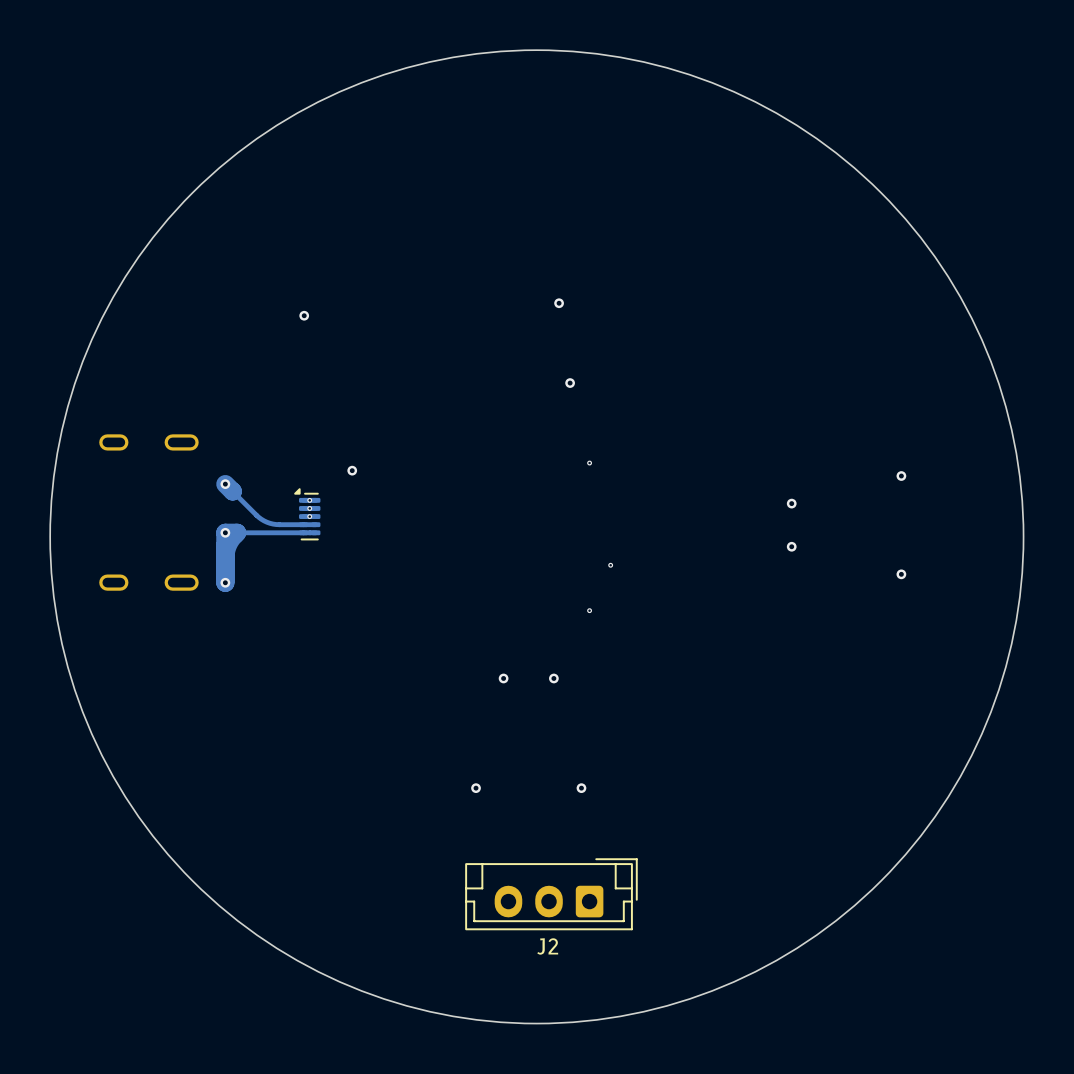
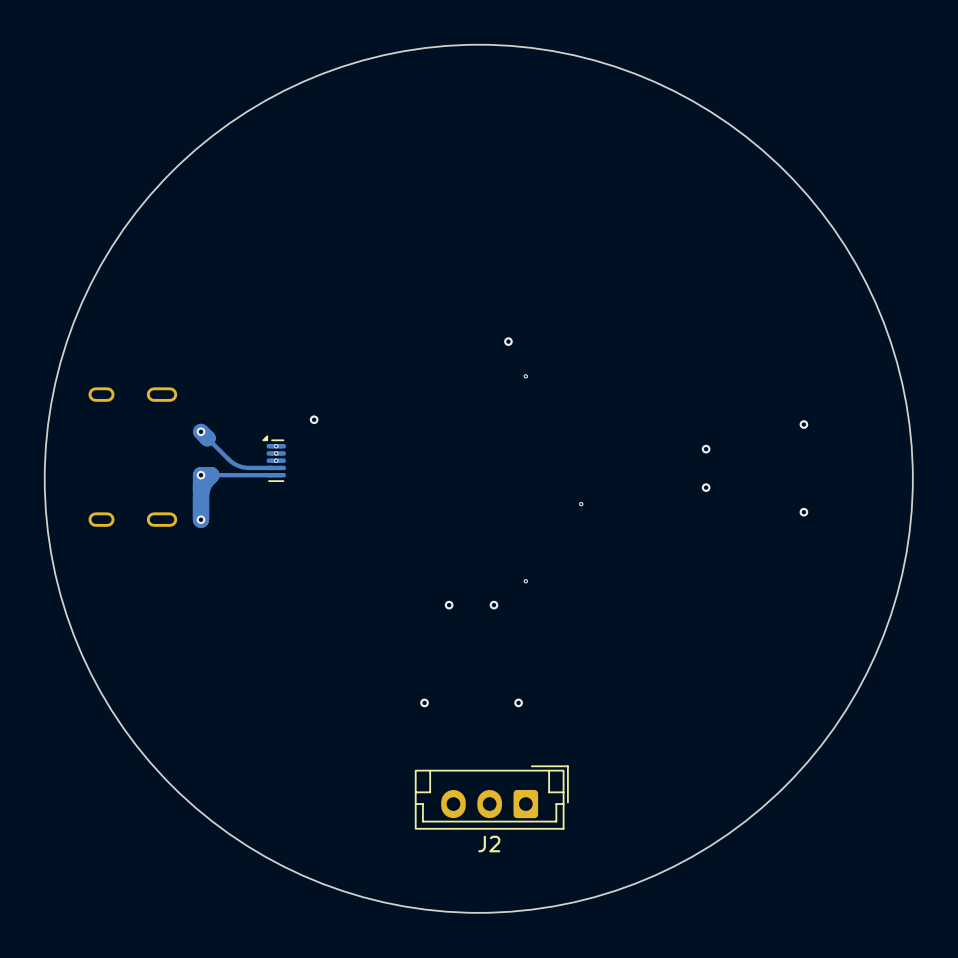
via: (559, 303) -> none
via: (304, 315) -> none
via position: (589, 463) -> (525, 376)
via: (610, 565) -> none
via: none -> (581, 504)
via: (589, 610) -> none
via: none -> (525, 581)

